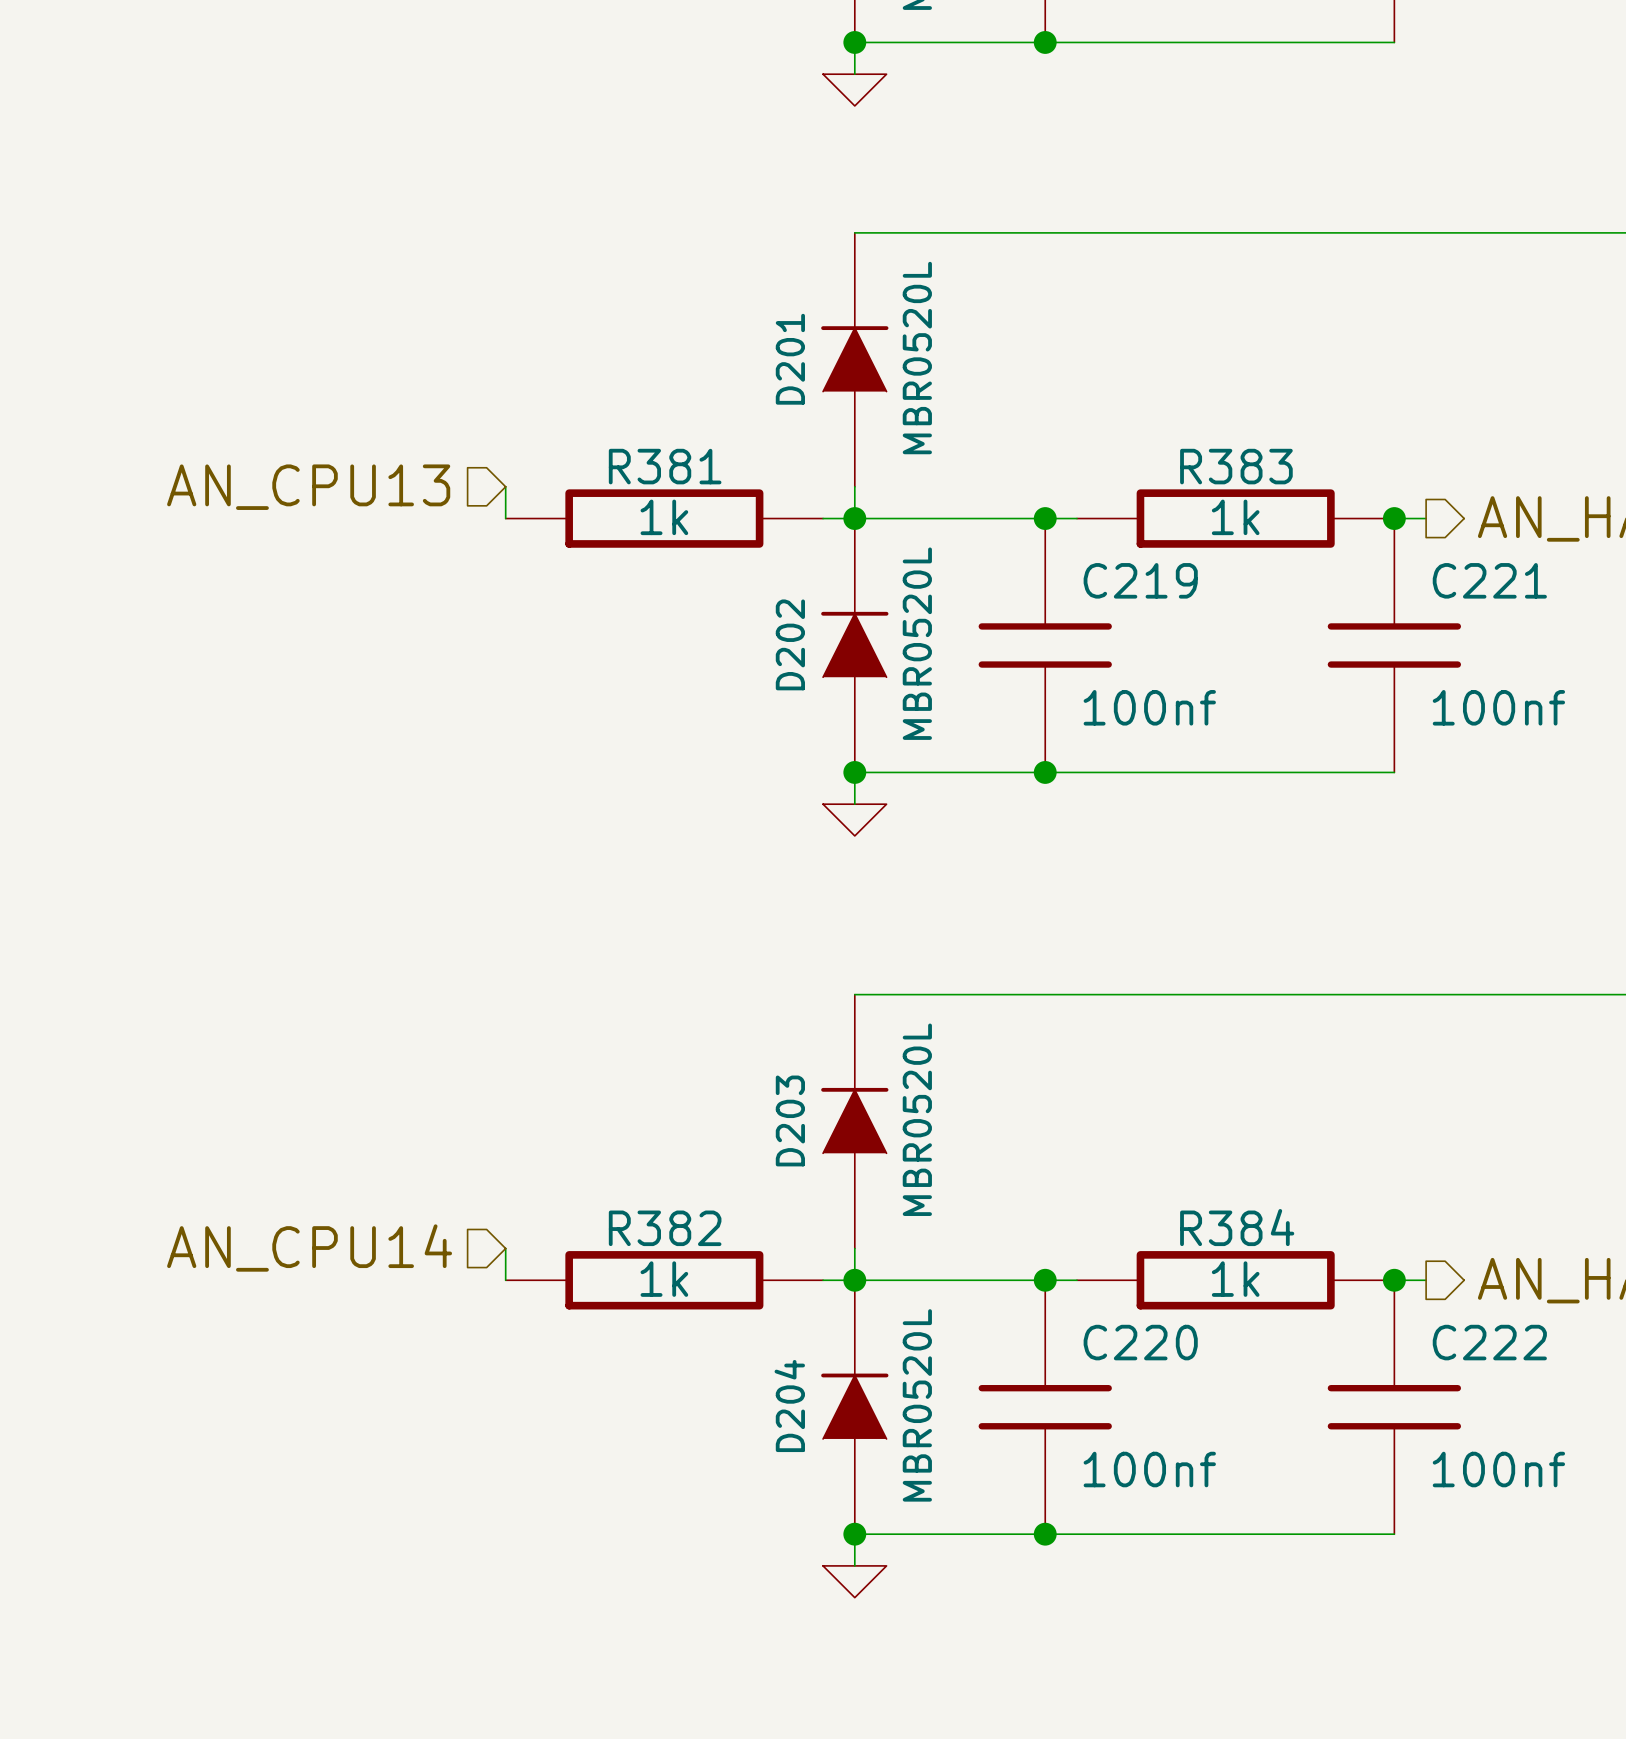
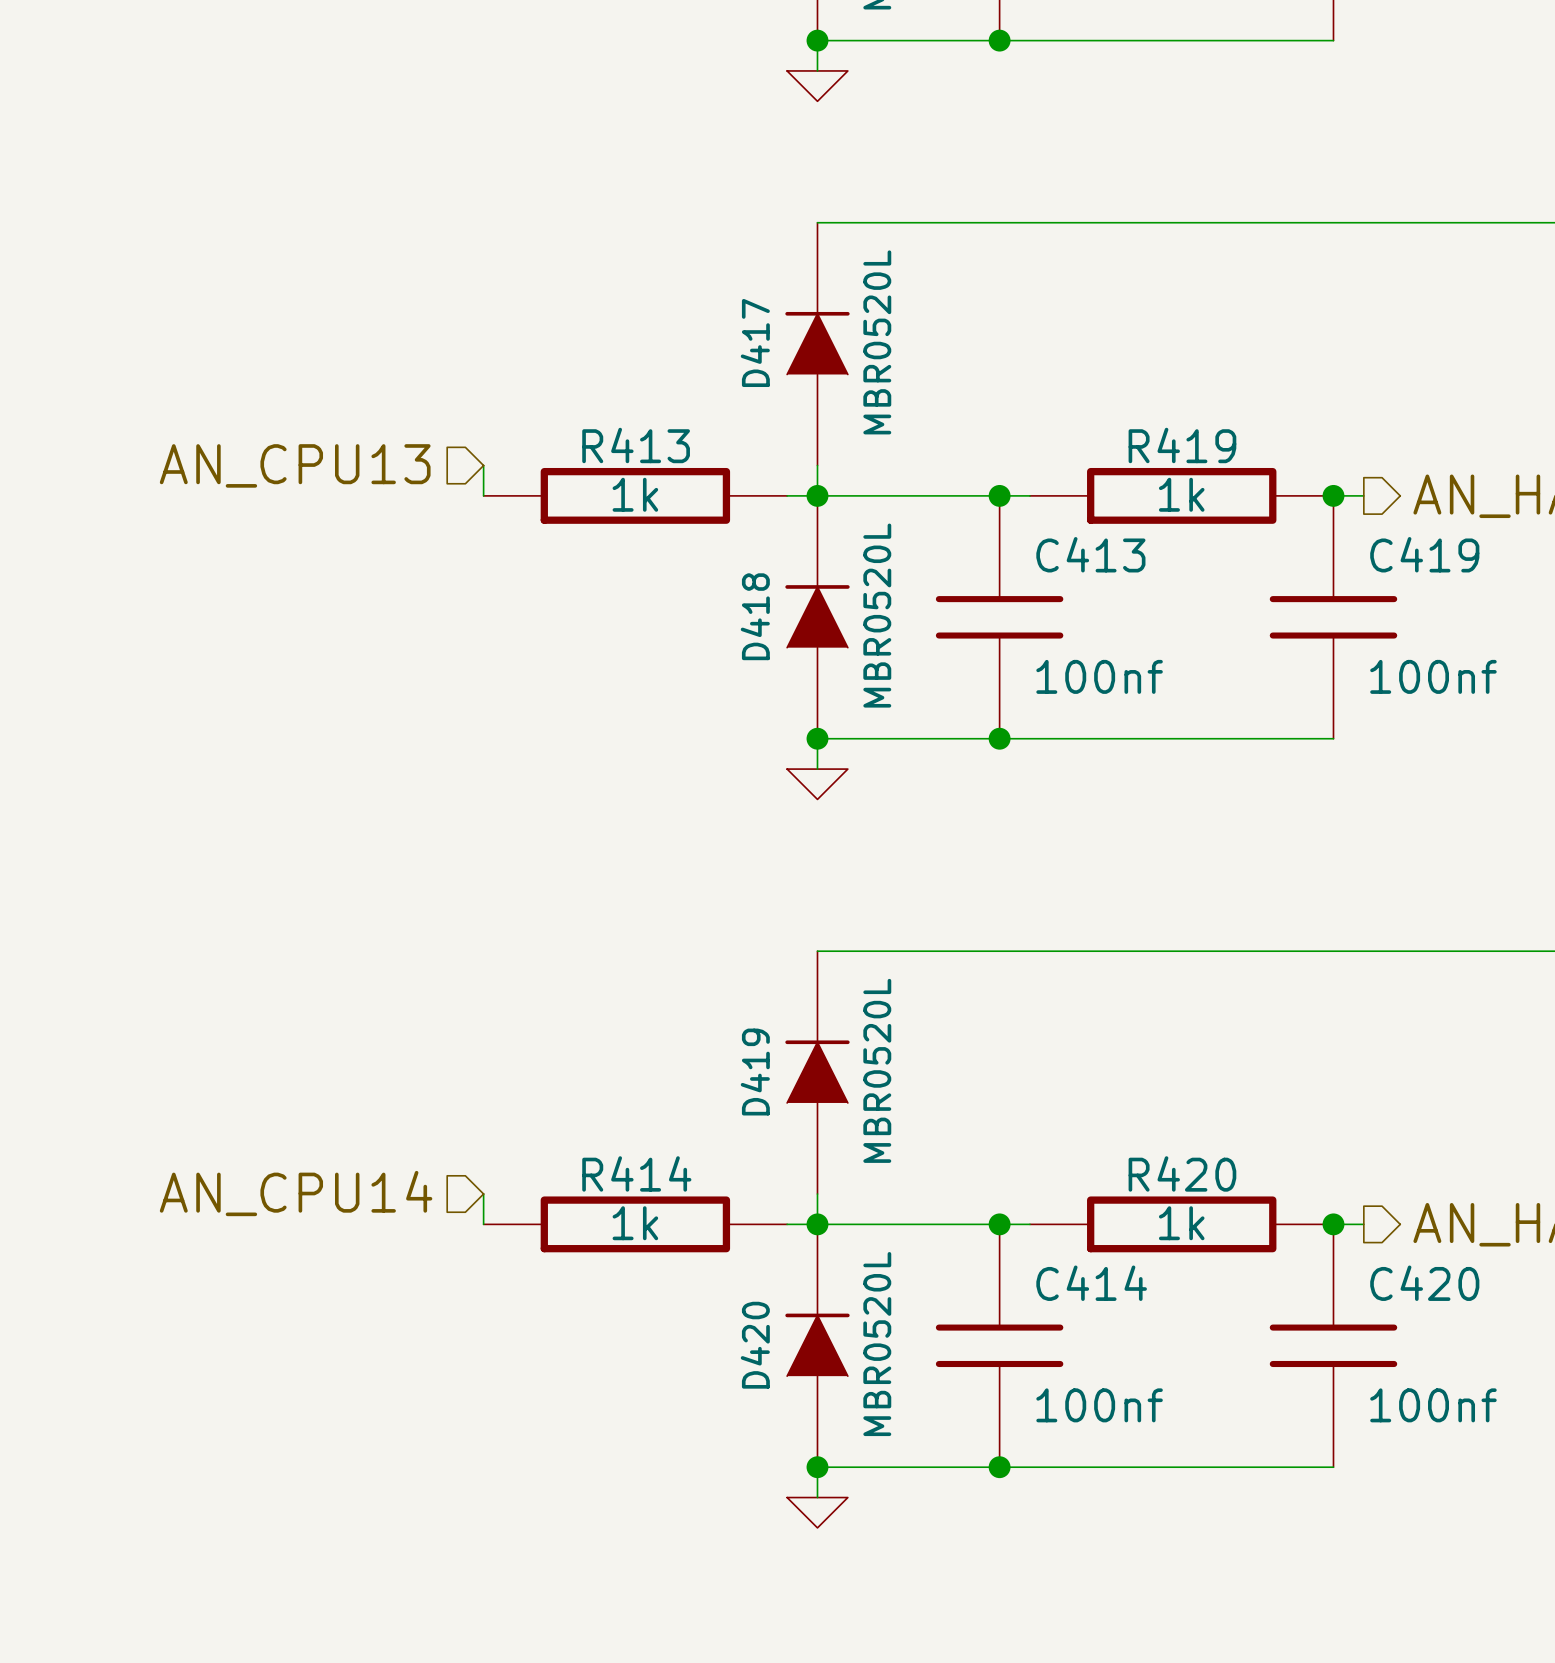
D201 name: D201 (790, 359) -> D417 (755, 342)
R381 name: R381 (665, 466) -> R413 (636, 445)
R383 name: R383 (1236, 466) -> R419 (1182, 445)
C219 name: C219 (1140, 580) -> C413 (1090, 554)
C221 name: C221 (1489, 580) -> C419 (1424, 554)
D202 name: D202 (790, 644) -> D418 (755, 616)
D203 name: D203 (790, 1120) -> D419 (755, 1072)
R384 name: R384 (1237, 1227) -> R420 (1182, 1173)
R382 name: R382 (665, 1228) -> R414 (636, 1173)
C220 name: C220 (1140, 1342) -> C414 (1091, 1283)
C222 name: C222 (1489, 1342) -> C420 (1424, 1283)
D204 name: D204 (789, 1406) -> D420 (755, 1345)

